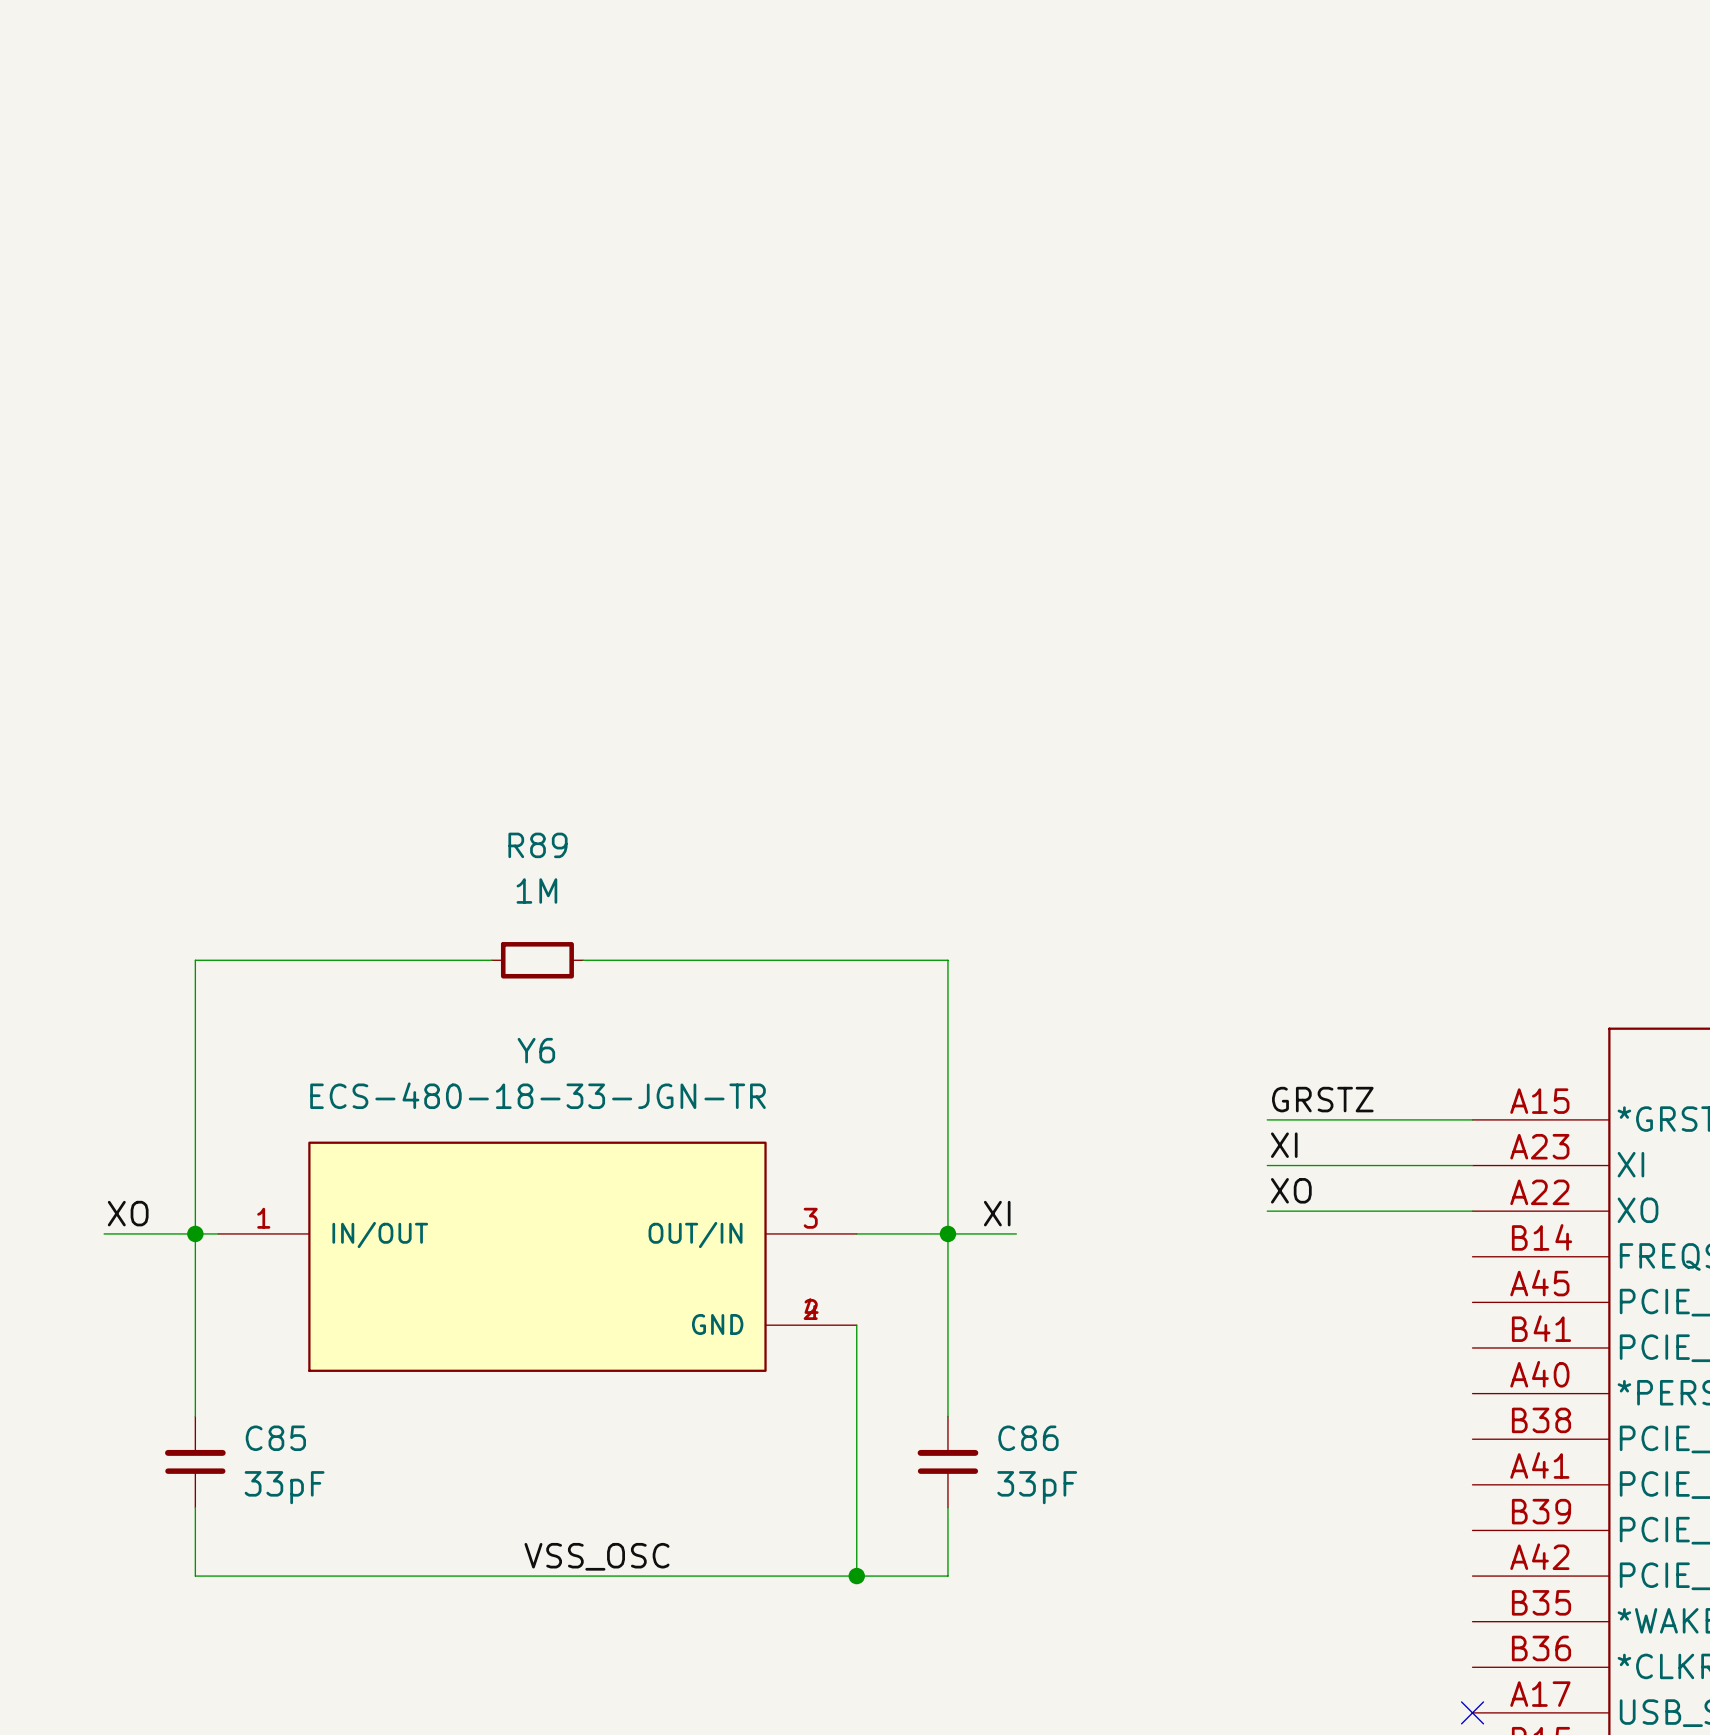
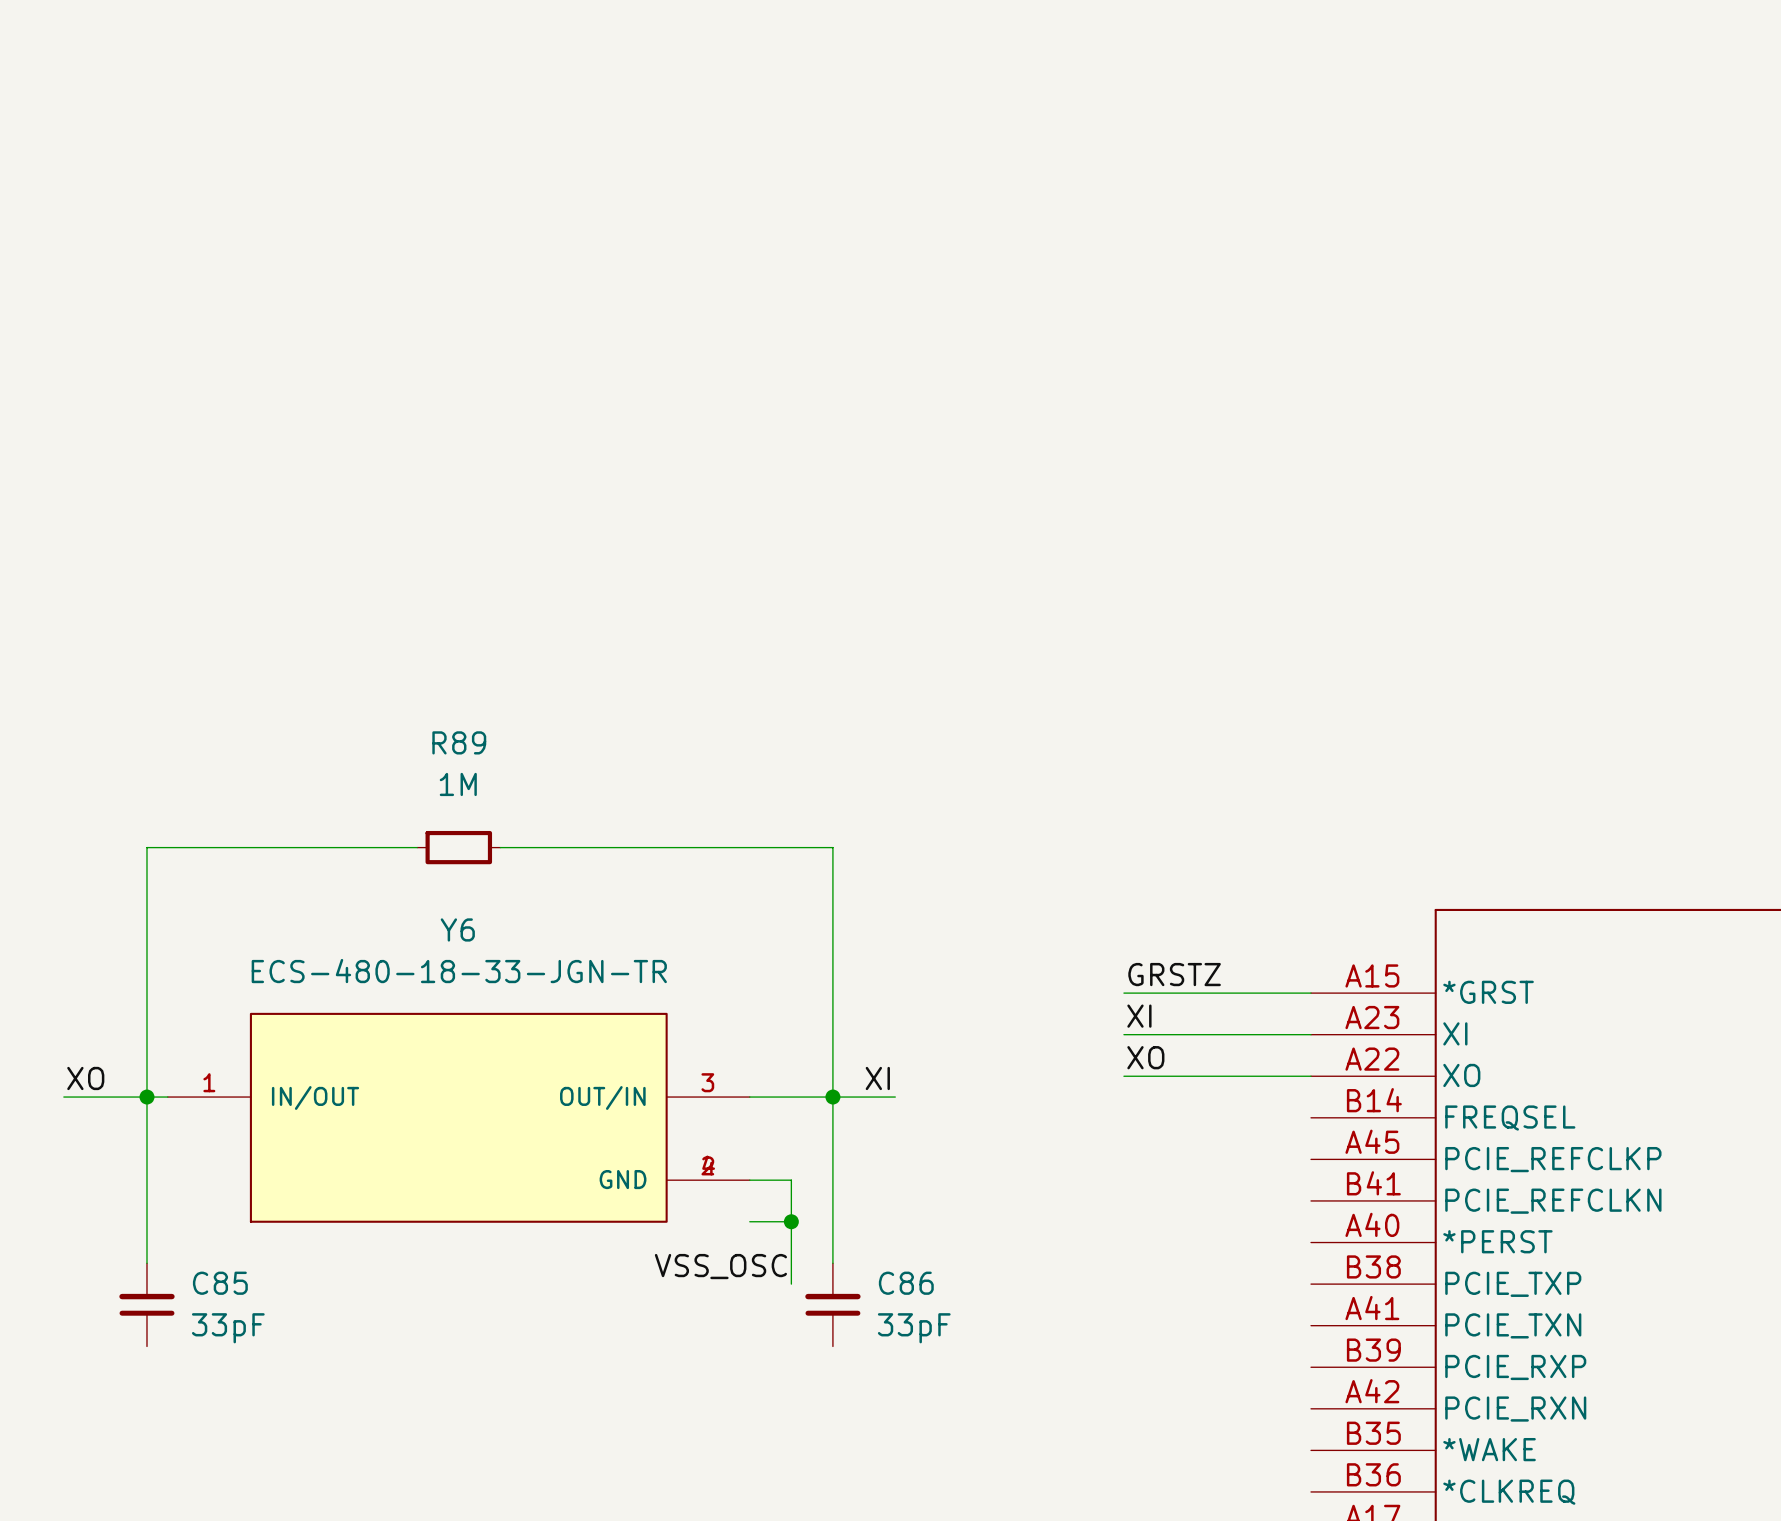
wire: (856, 1325) (856, 1576) -> (749, 1180) (791, 1180) (791, 1284)
wire: none -> (749, 1221) (791, 1221)
junction: none -> (791, 1221)
wire: (195, 1507) (195, 1576) (947, 1576) (947, 1507) -> none
label position: VSS_OSC (597, 1556) -> VSS_OSC (720, 1266)
junction: (856, 1576) -> none

